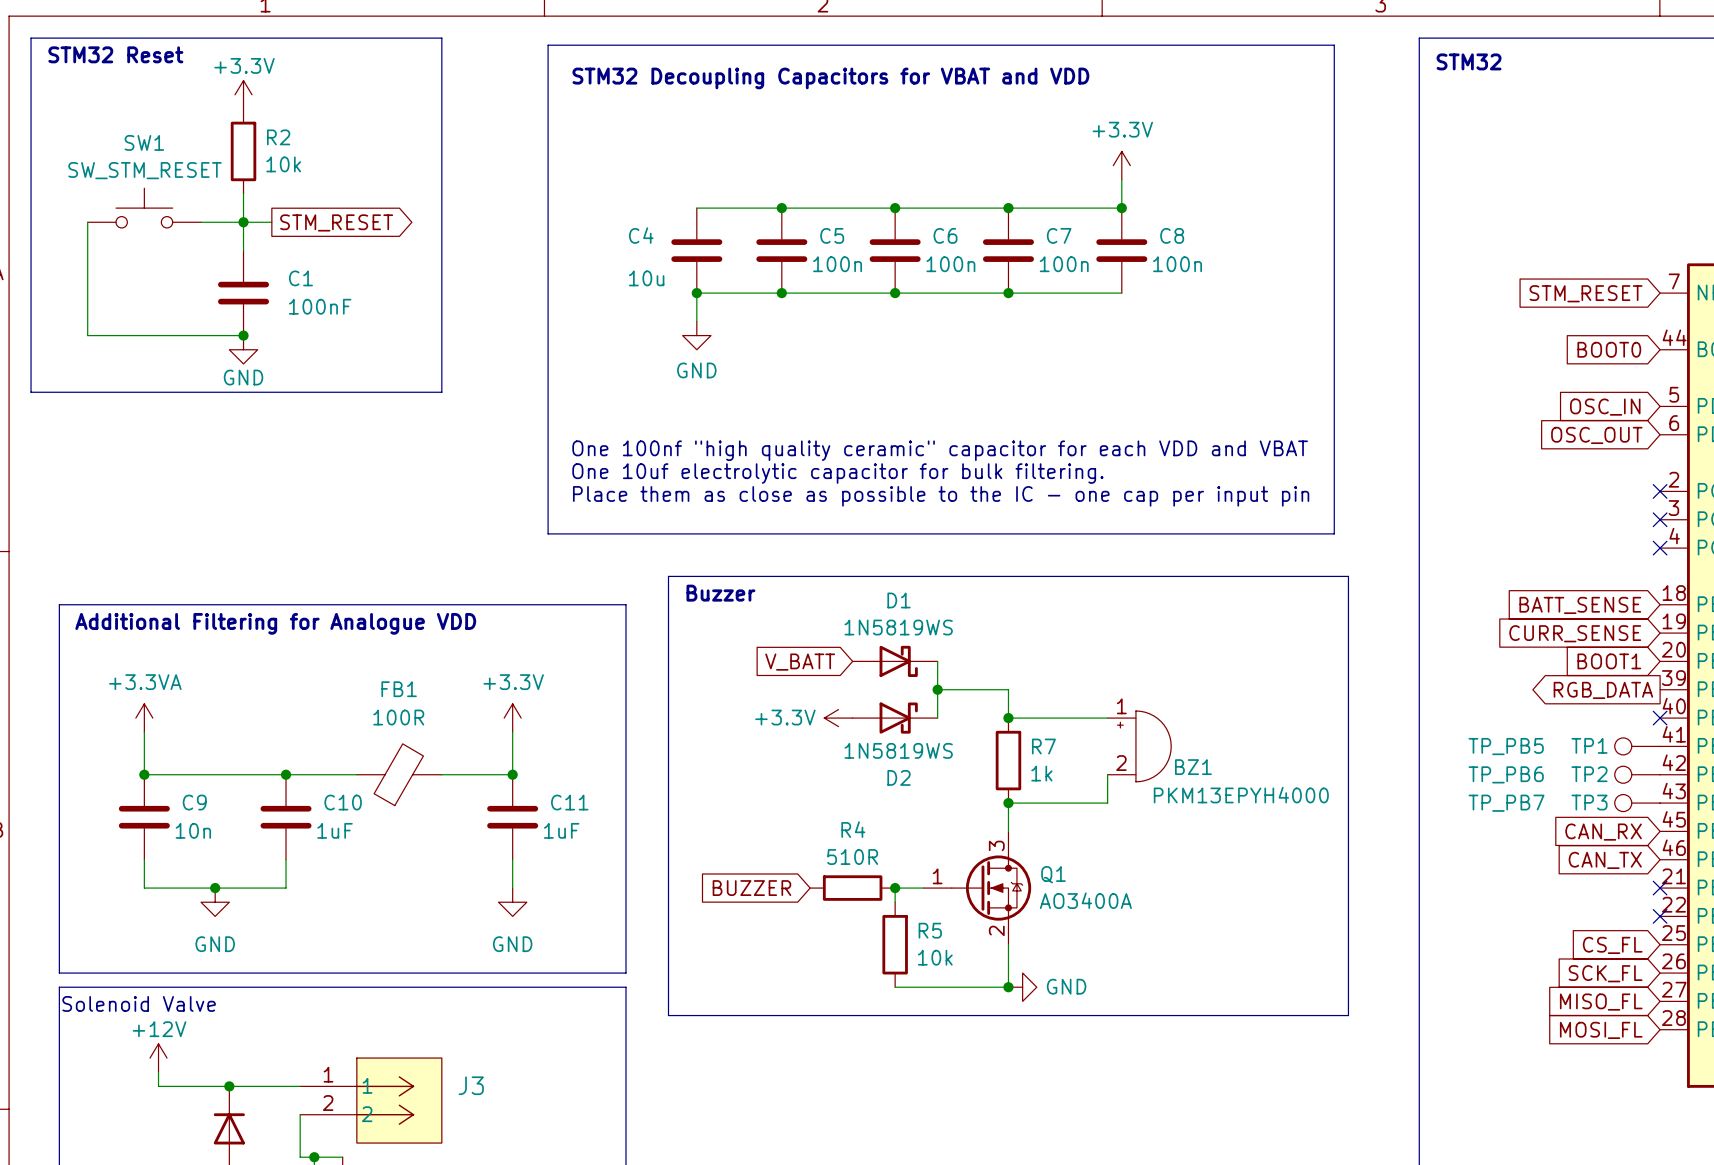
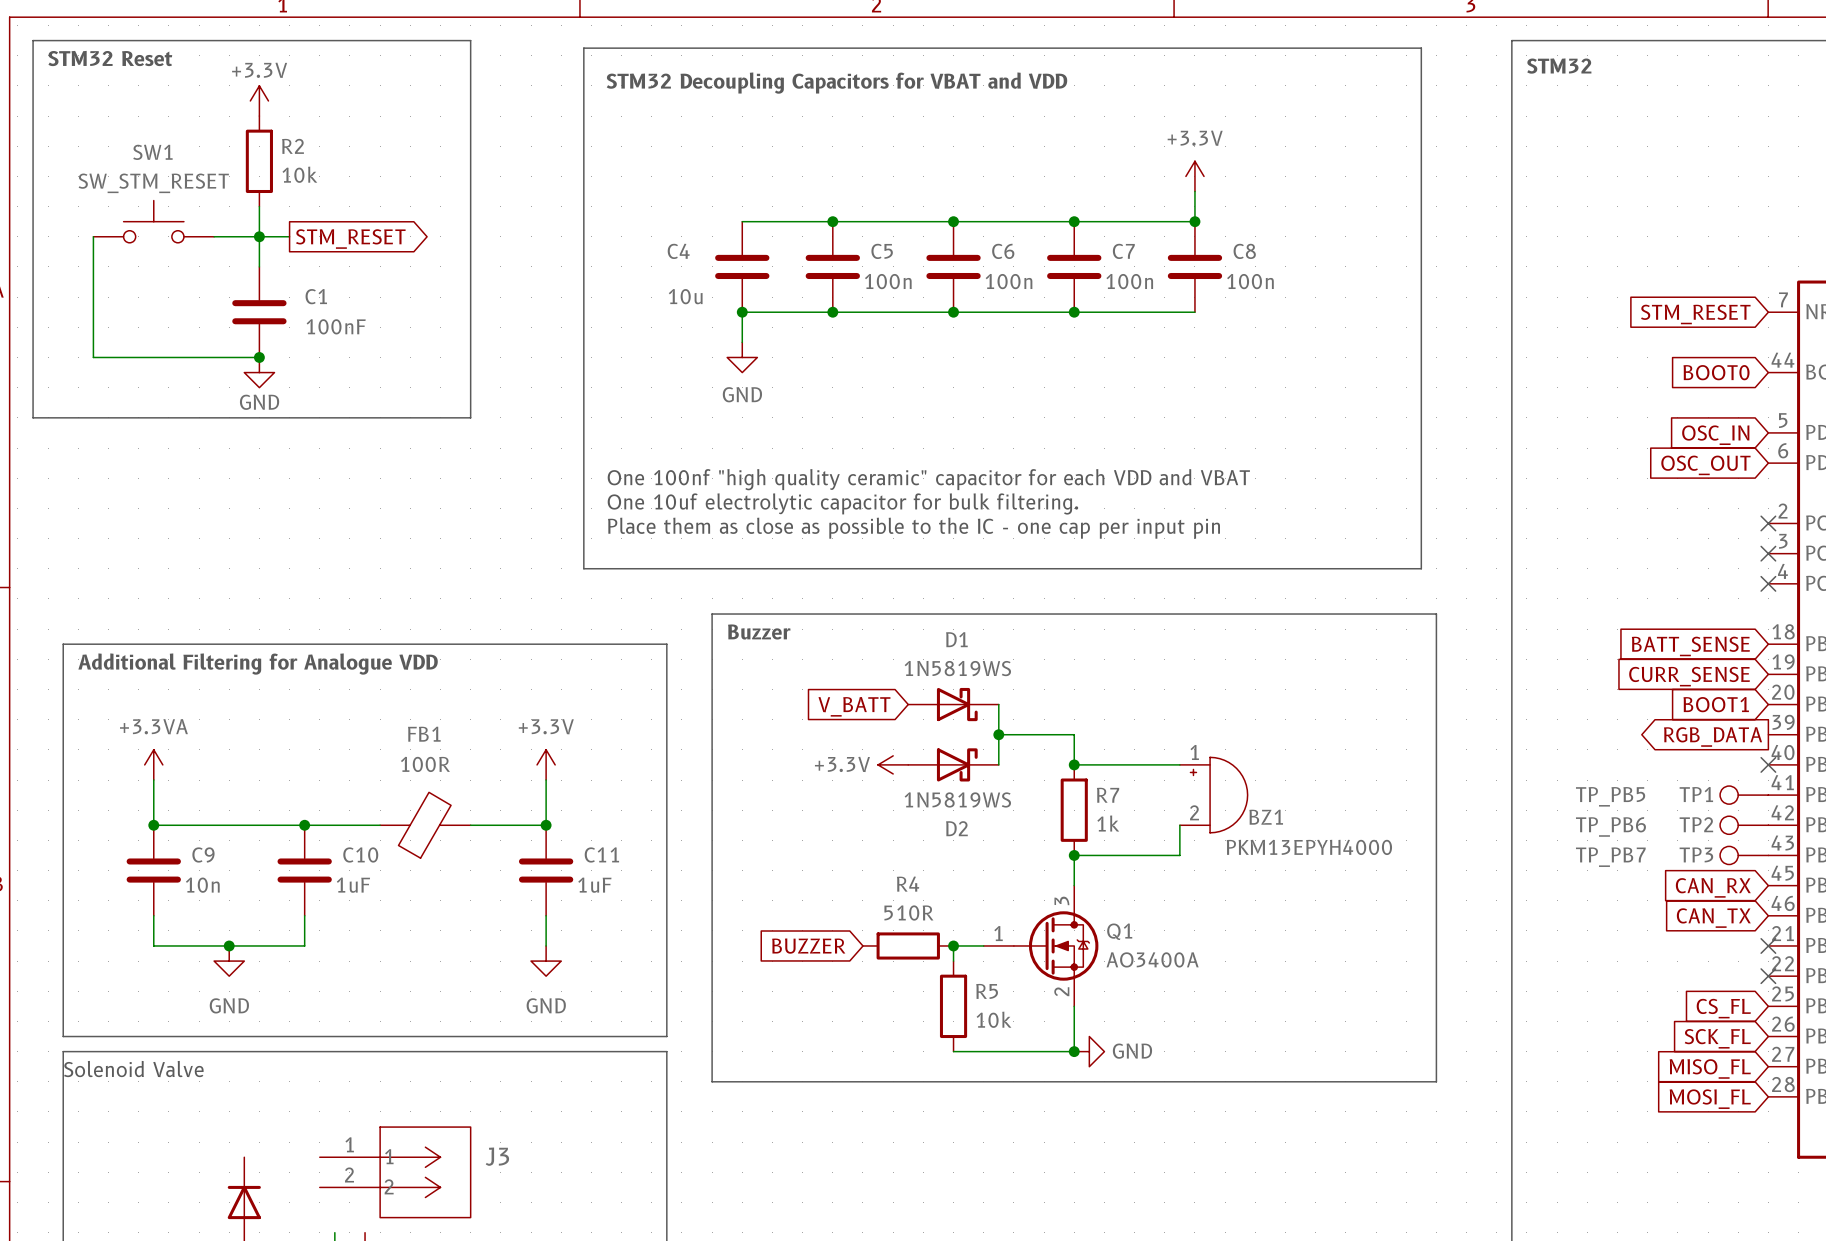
power symbol: +12V (158, 1058) -> none
wire: (158, 1072) (158, 1086) (300, 1086) -> none
junction: (229, 1086) -> none
wire: (300, 1114) (300, 1157) (342, 1157) -> none
junction: (314, 1157) -> none

